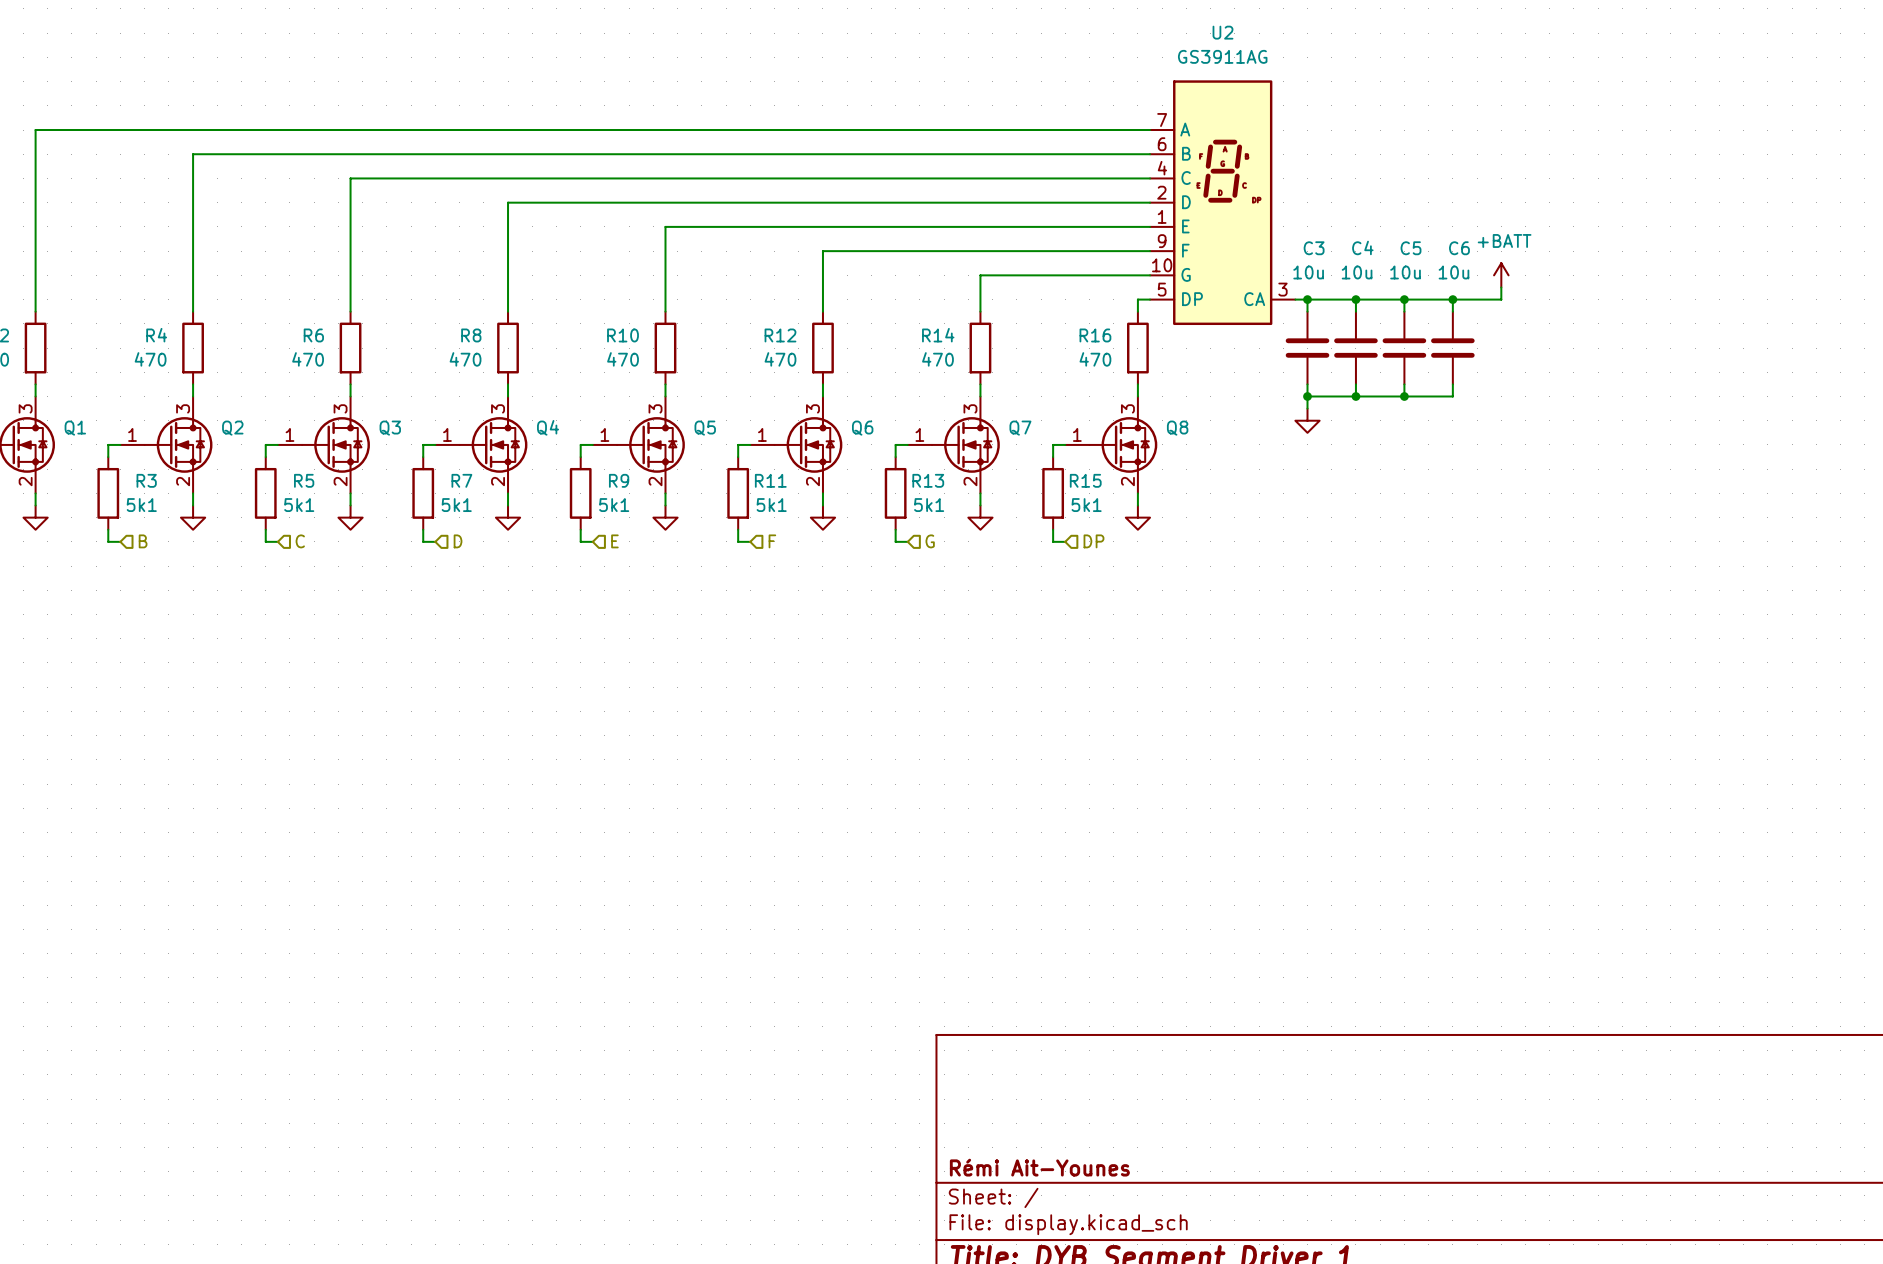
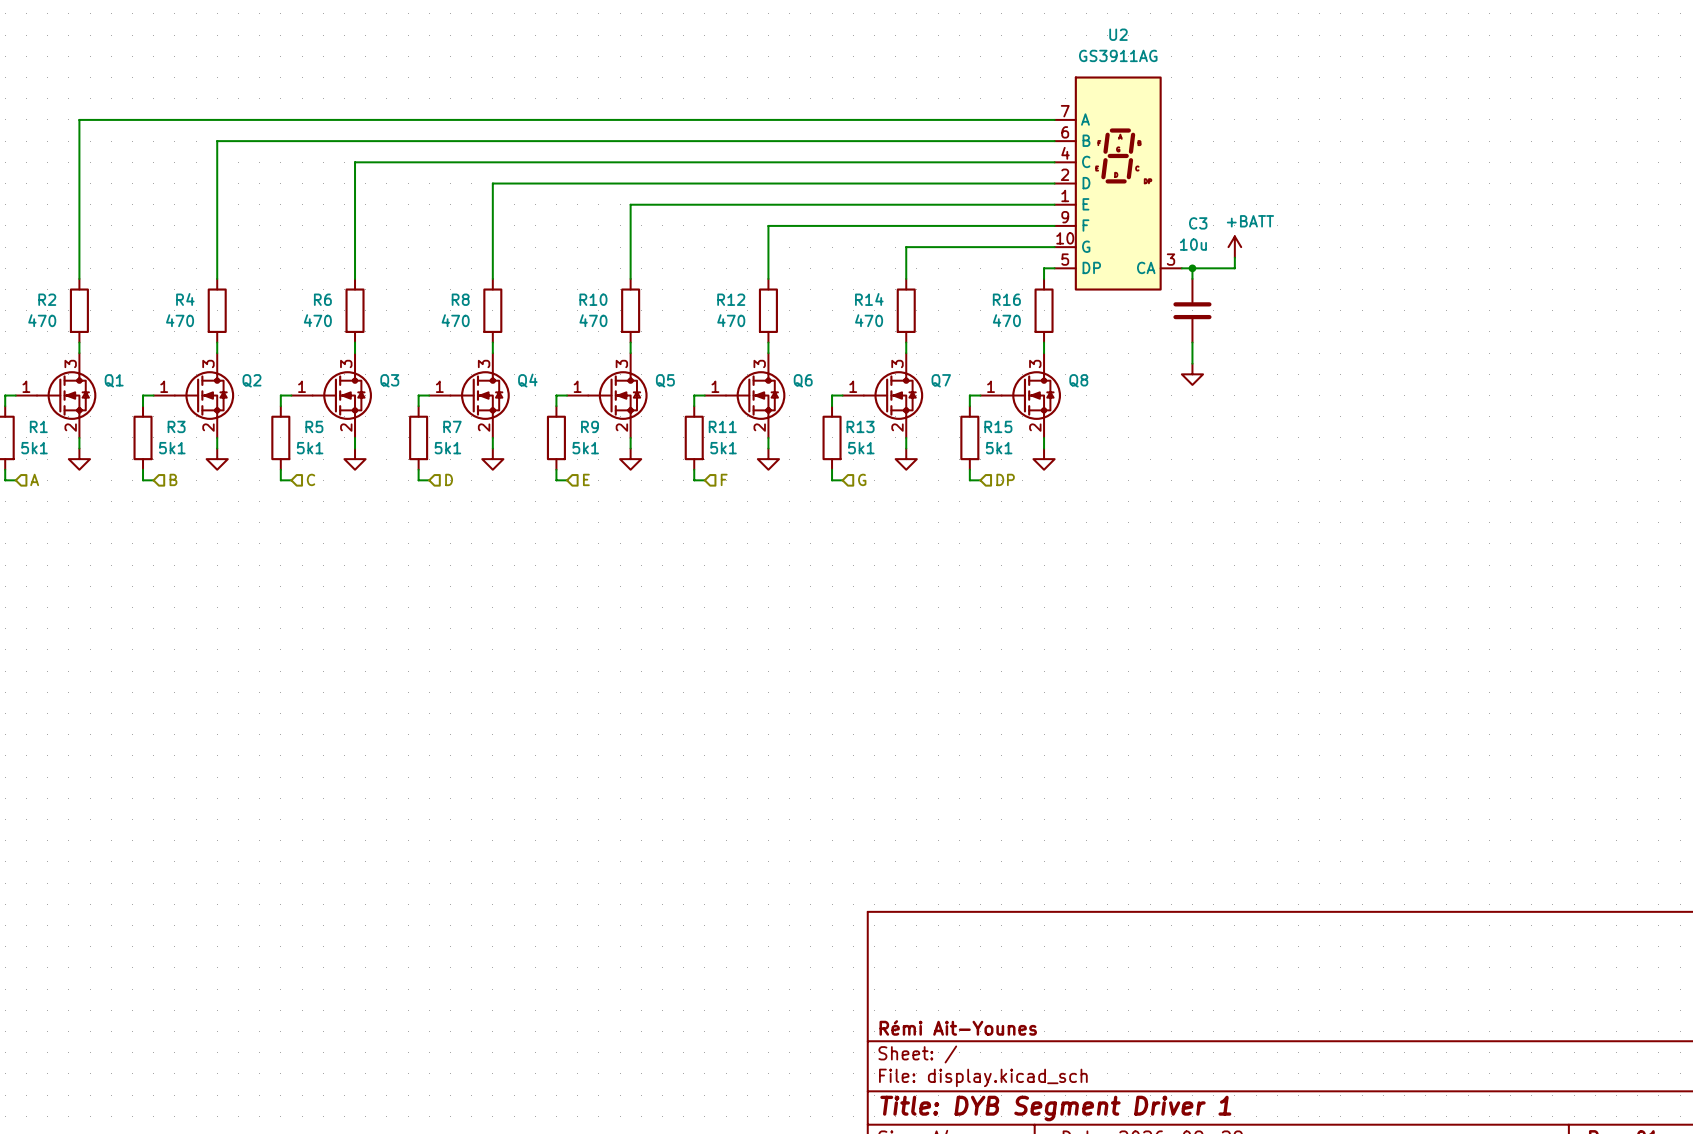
power symbol text position: +BATT (1504, 240) -> +BATT (1250, 221)
power symbol position: +BATT (1501, 275) -> +BATT (1234, 247)
wire: (1501, 287) (1501, 299) (1355, 299) (1355, 311) -> none
junction: (1355, 299) -> none
wire: (1404, 299) (1404, 311) -> (1234, 257) (1234, 268)
junction: (1404, 299) -> none
wire: (1452, 299) (1452, 311) -> none
junction: (1452, 299) -> none
C4: 10u (1355, 348) -> none
C5: 10u (1404, 348) -> none
C6: 10u (1452, 348) -> none
wire: (1355, 384) (1355, 396) -> none
wire: (1404, 384) (1404, 396) -> none
wire: (1452, 384) (1452, 396) (1307, 396) -> none
junction: (1307, 396) -> none
junction: (1355, 396) -> none
junction: (1404, 396) -> none

